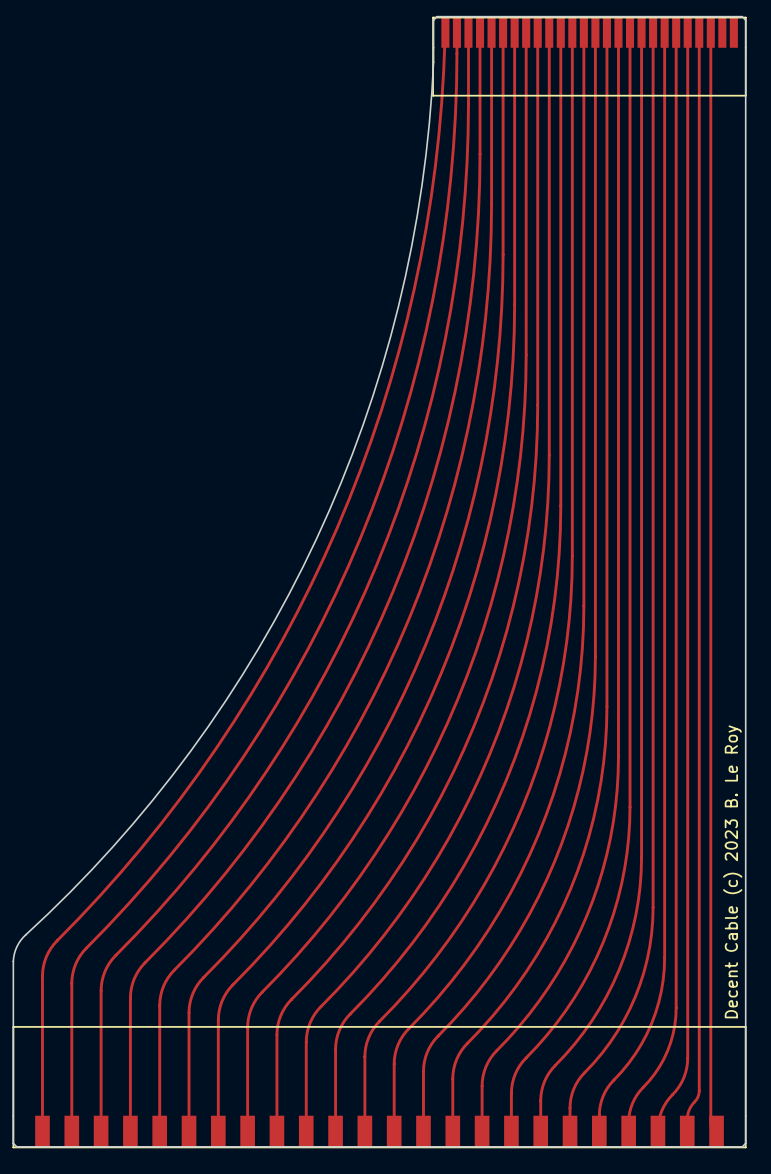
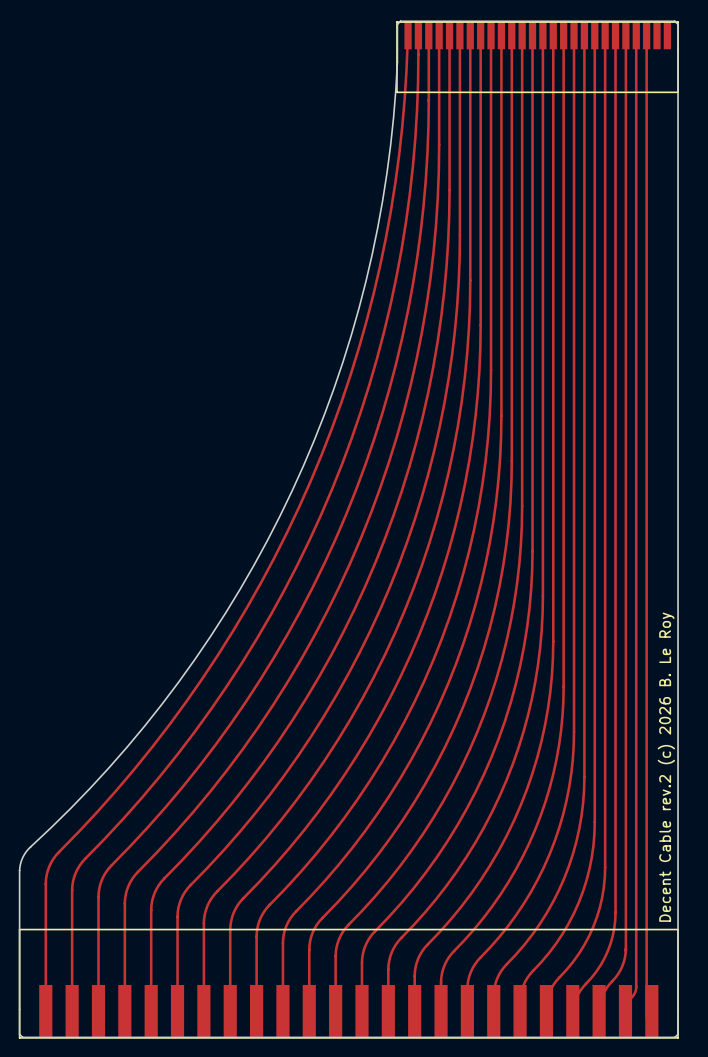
text: Decent Cable (c) 2023 B. Le Roy (732, 871) -> Decent Cable rev.2 (c) 2026 B. Le Roy (666, 767)
top track: none -> (625, 948) (622, 966) (604, 991) (599, 1013)
top track: (687, 1050) (687, 1063) (683, 1077) (663, 1106) (657, 1130) -> none
part: none -> (348, 1011)
part: (379, 1131) -> none

